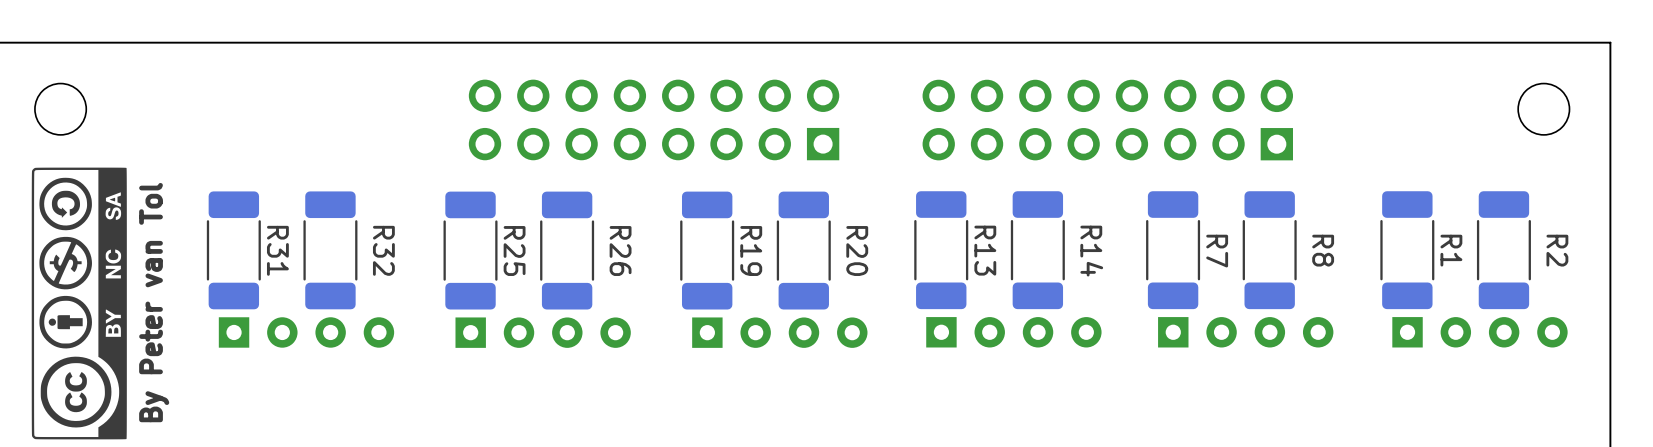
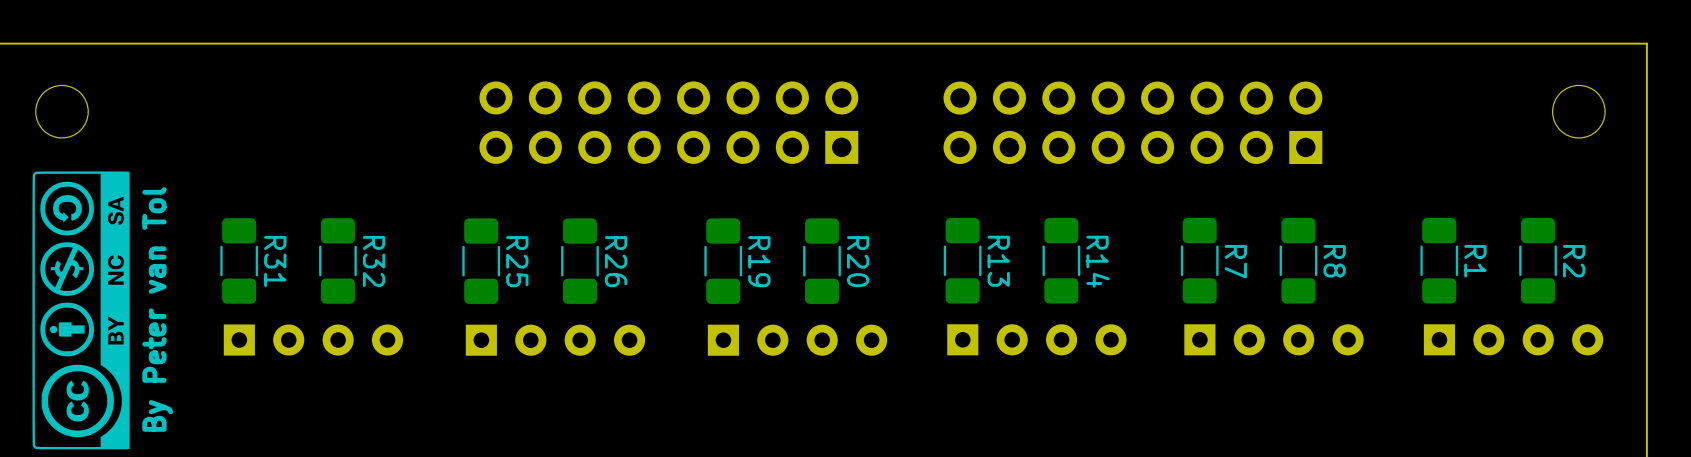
R31 footprint: [206, 191, 261, 310] -> [220, 218, 259, 304]
R32 footprint: [303, 191, 358, 310] -> [319, 218, 357, 304]
R25 footprint: [443, 191, 498, 310] -> [462, 218, 501, 304]
R26 footprint: [540, 191, 595, 310] -> [561, 218, 599, 304]
R19 footprint: [680, 191, 735, 310] -> [704, 218, 743, 304]
R20 footprint: [776, 191, 831, 310] -> [803, 218, 841, 304]
R13 footprint: [914, 191, 969, 310] -> [943, 218, 982, 304]
R14 footprint: [1010, 191, 1065, 310] -> [1042, 218, 1081, 304]
R7 footprint: [1146, 191, 1201, 310] -> [1180, 218, 1219, 304]
R8 footprint: [1242, 191, 1297, 310] -> [1279, 218, 1318, 304]
R1 footprint: [1380, 191, 1435, 310] -> [1420, 218, 1459, 304]
R2 footprint: [1476, 191, 1531, 310] -> [1519, 218, 1557, 304]

